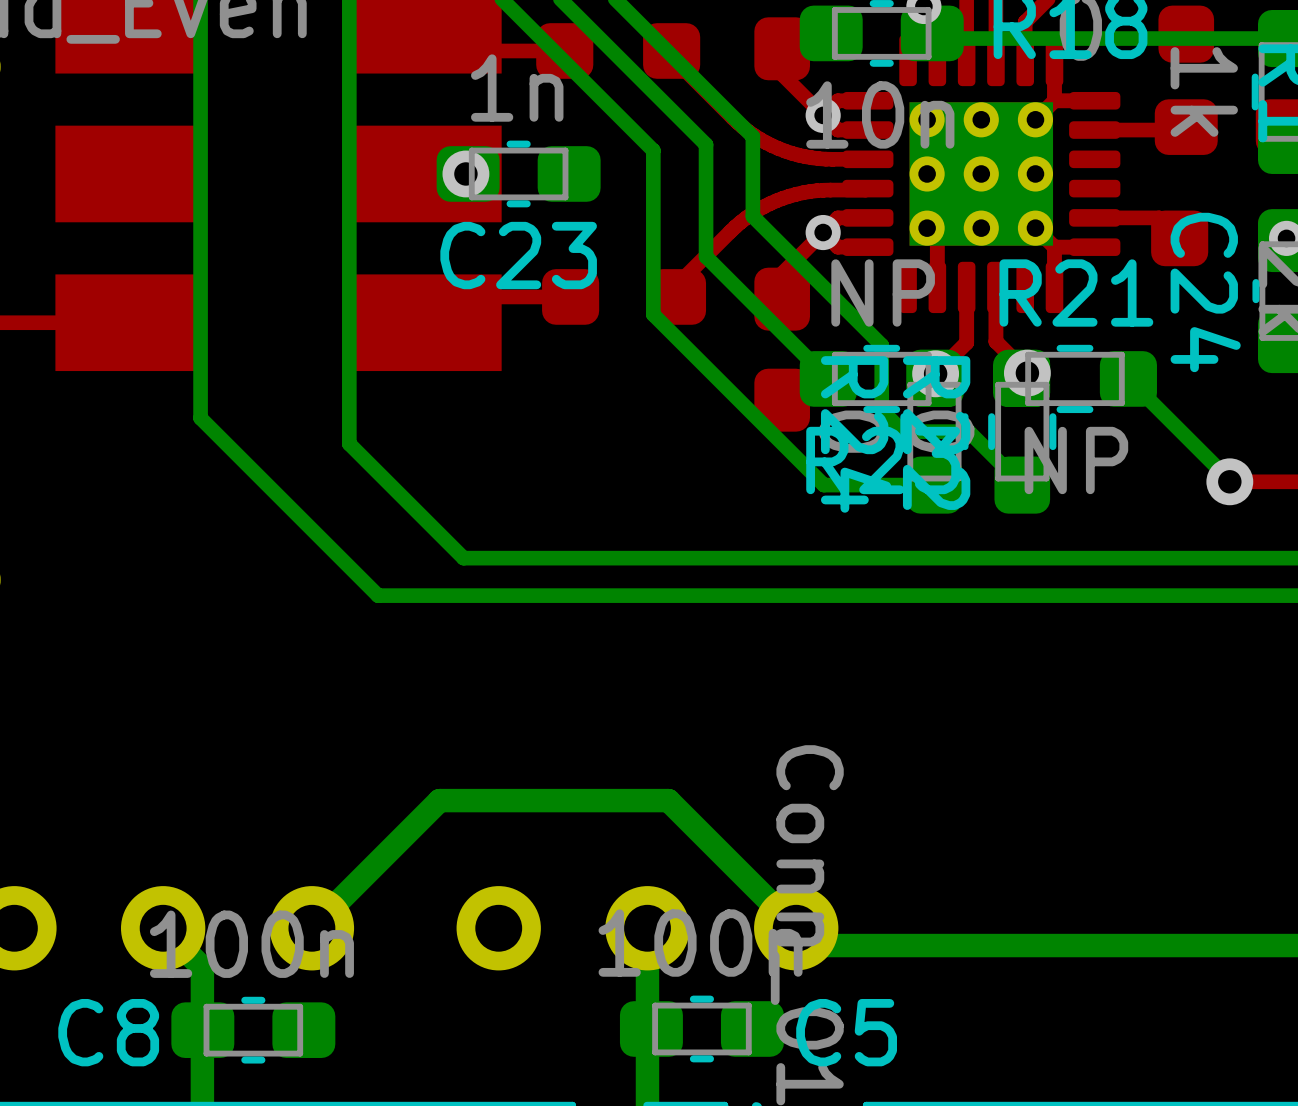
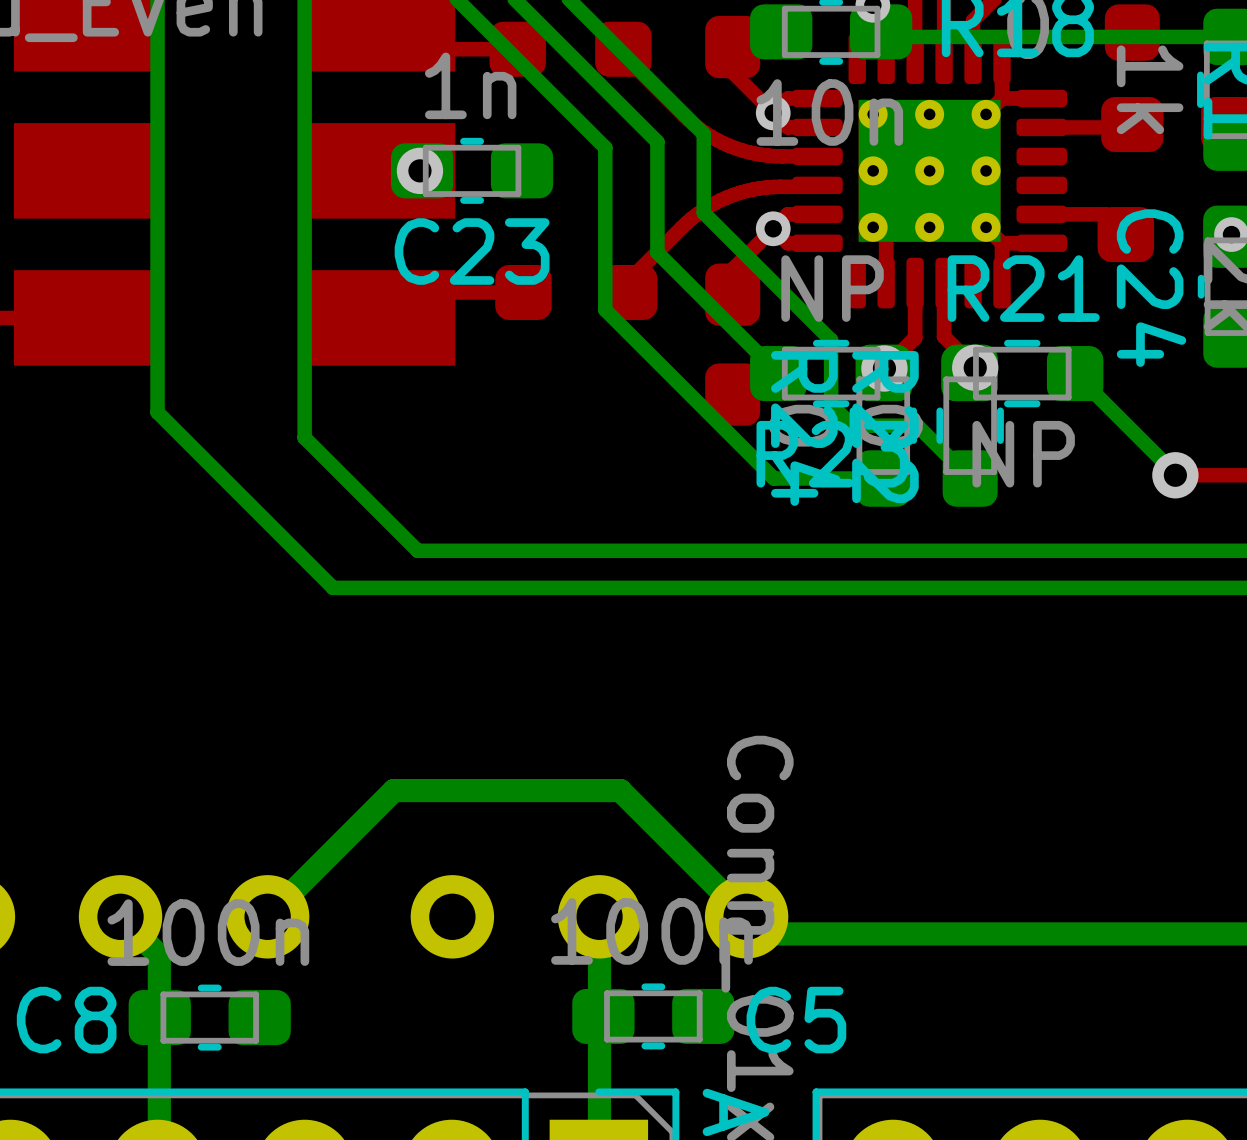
part footprint: [842, 34, 1121, 314] -> [792, 33, 1068, 309]

